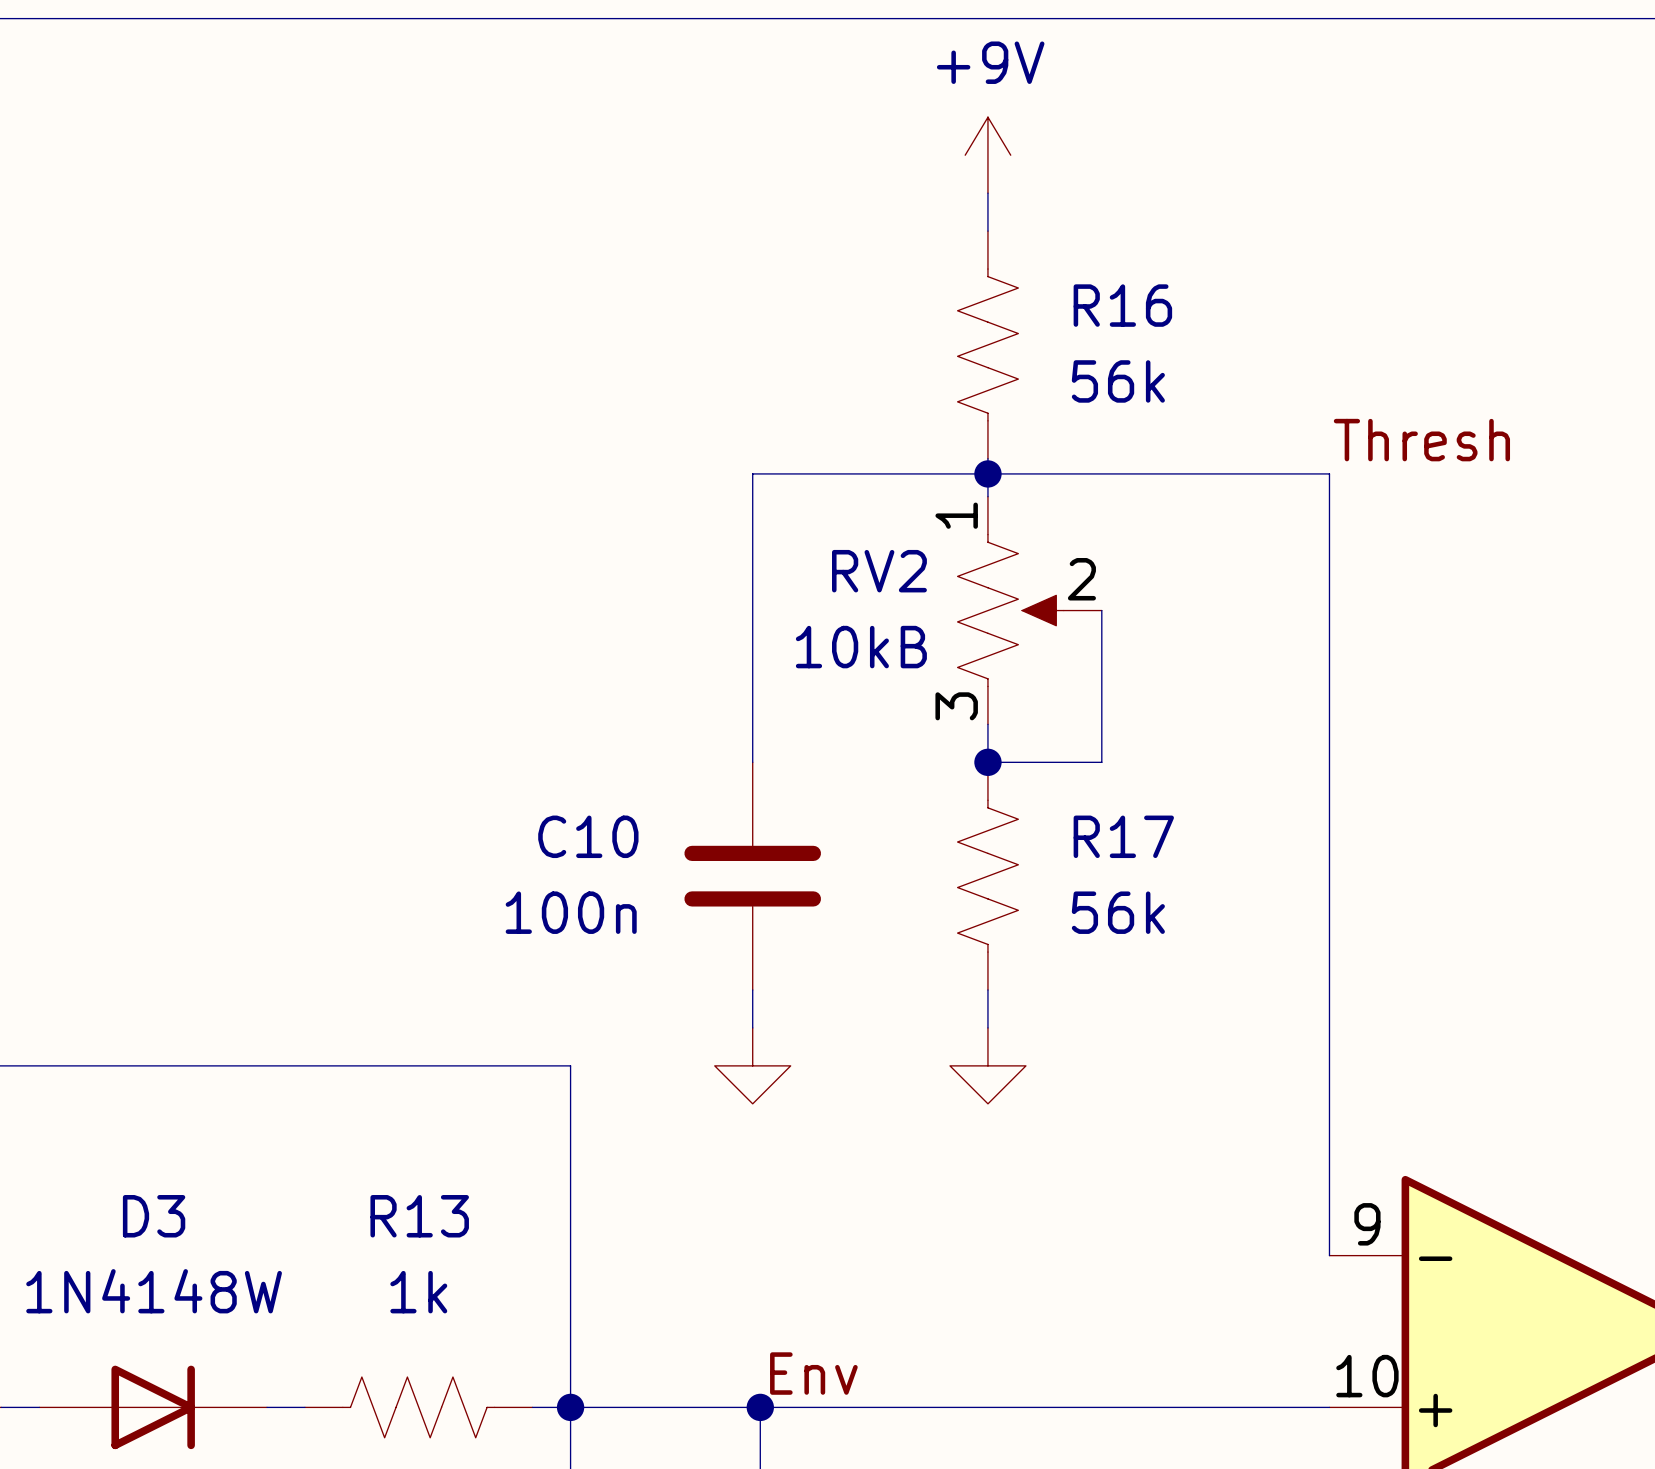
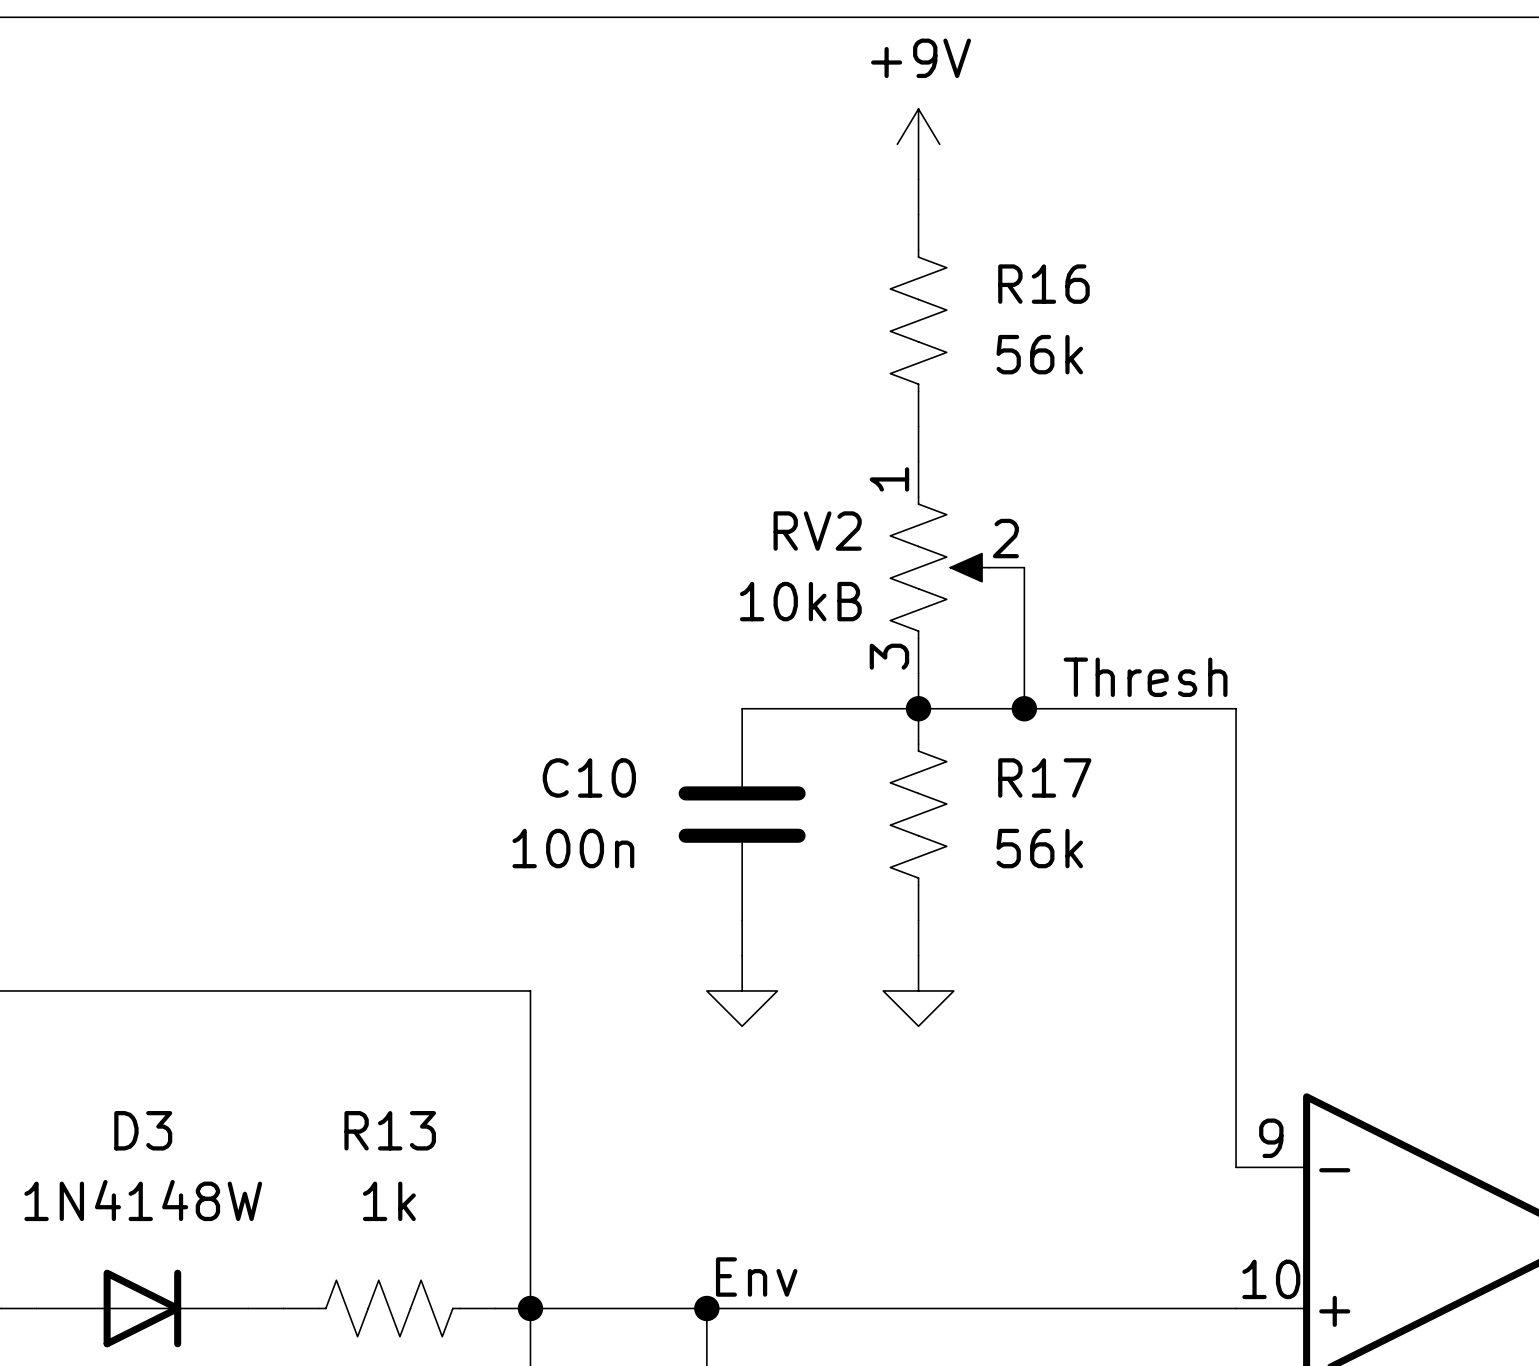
label position: Thresh (1421, 440) -> Thresh (1145, 677)
junction: (987, 473) -> none
wire: (752, 762) (752, 473) (1329, 473) (1329, 762) -> (1024, 708) (1236, 708)
wire: none -> (742, 708) (918, 708)
junction: none -> (1024, 708)
C10 position: (752, 876) -> (742, 814)
wire: (752, 990) (752, 1027) -> (742, 920) (742, 955)
power symbol position: (752, 1065) -> (742, 990)

